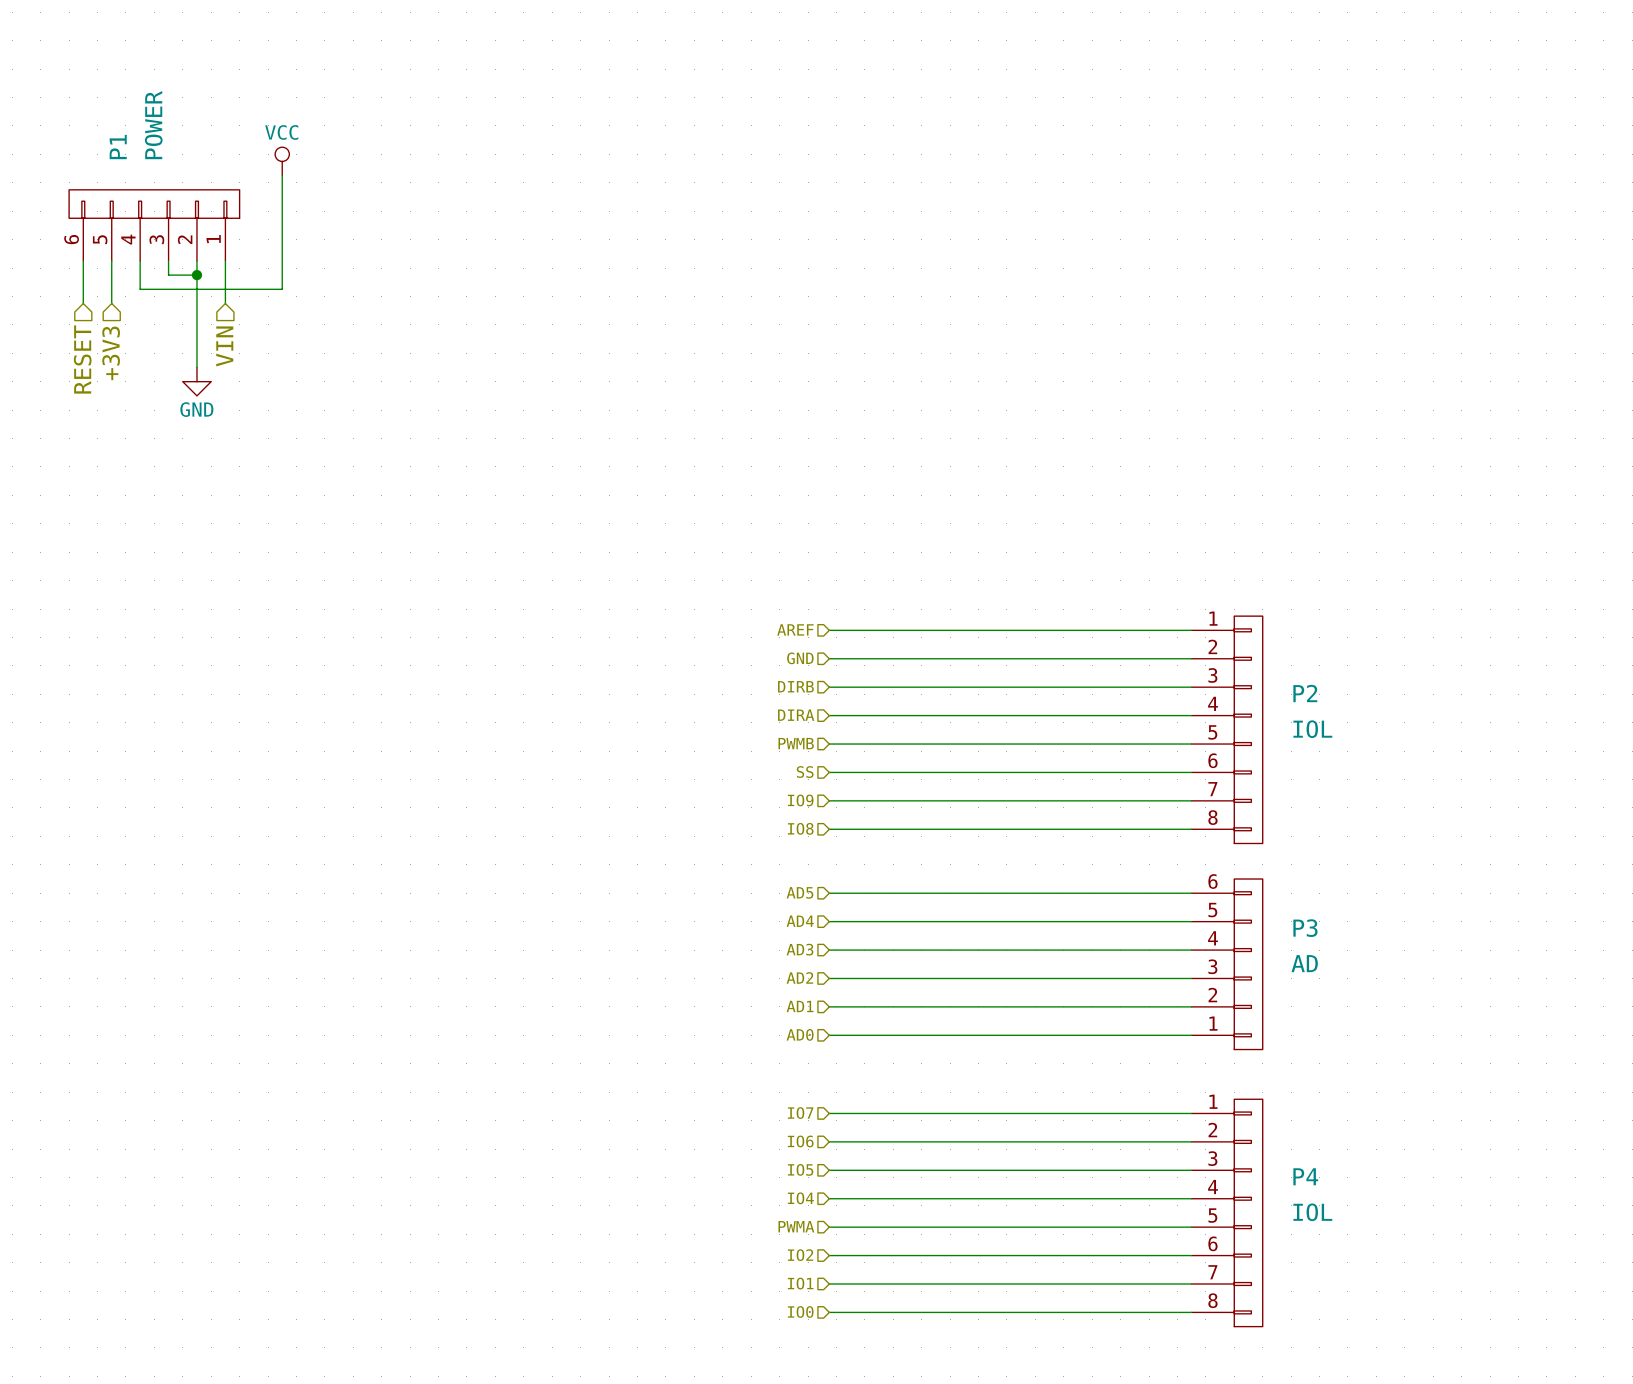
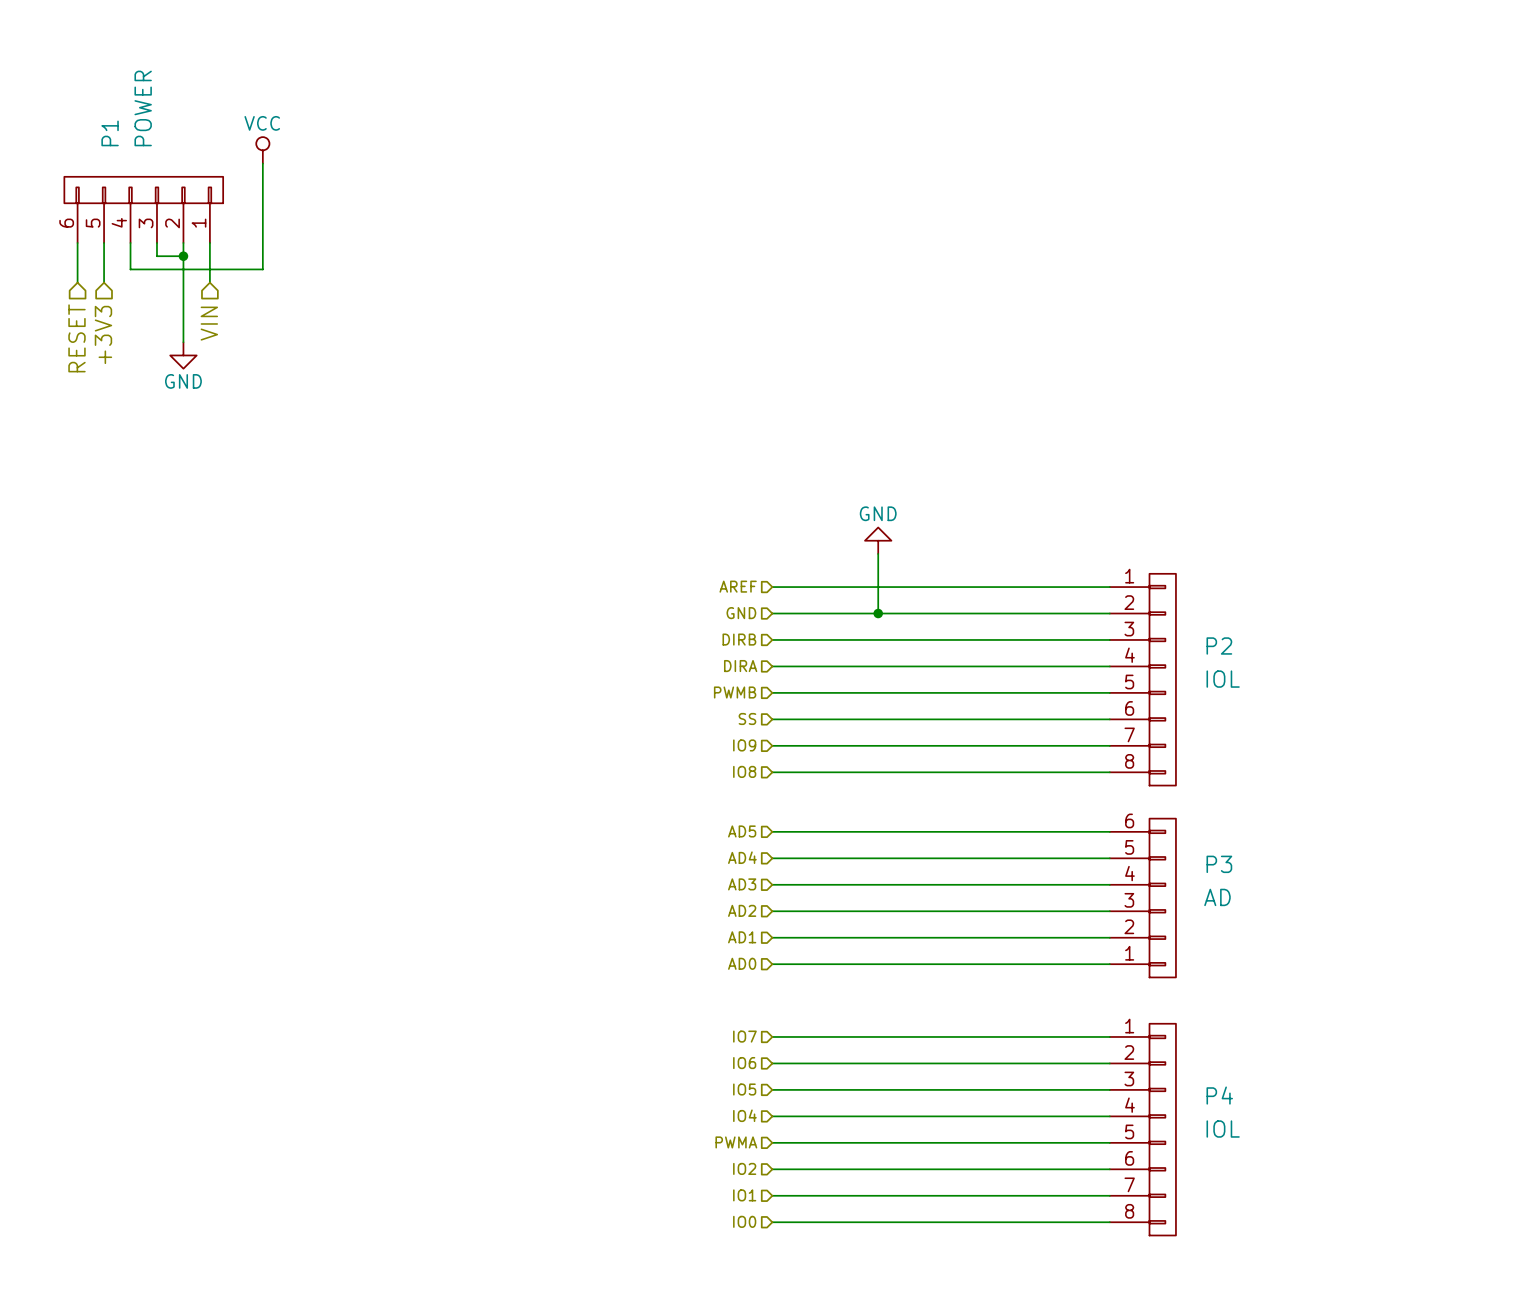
power symbol: none -> GND (878, 540)
wire: none -> (878, 553) (878, 613)
junction: none -> (878, 613)

